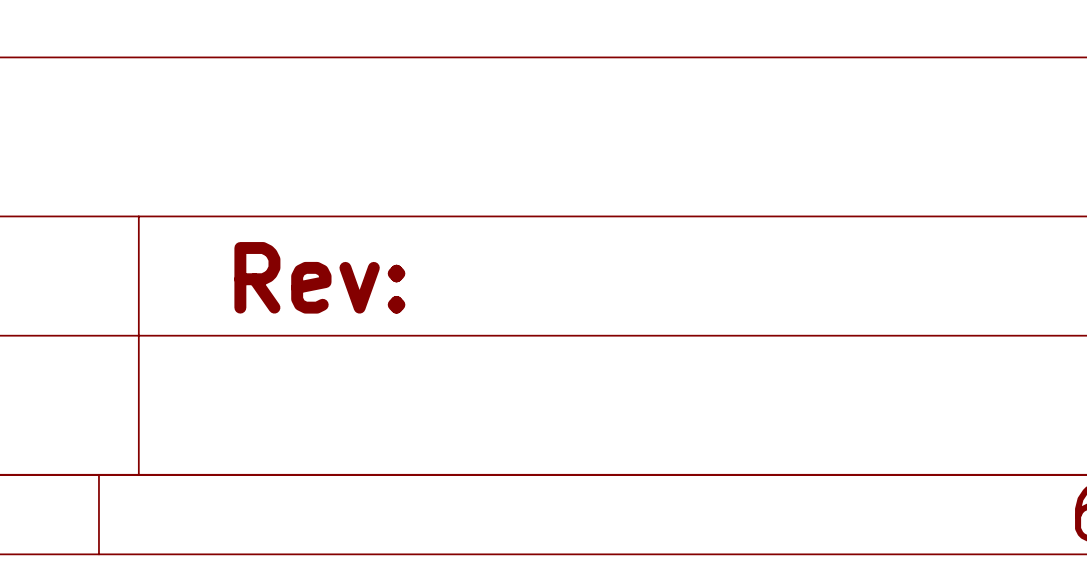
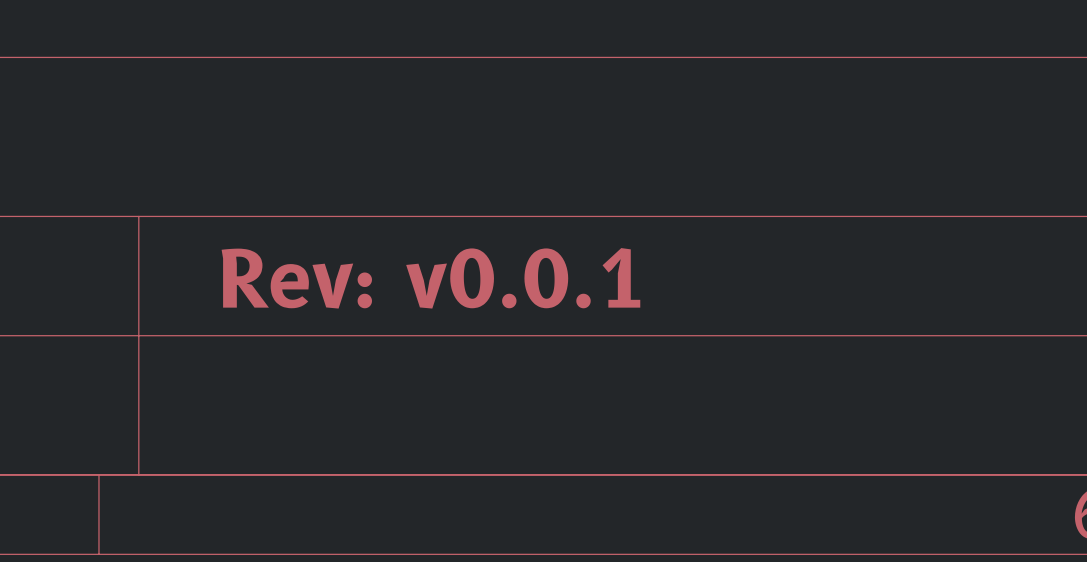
title block: Rev: (319, 277) -> Rev: v0.0.1 (430, 278)

